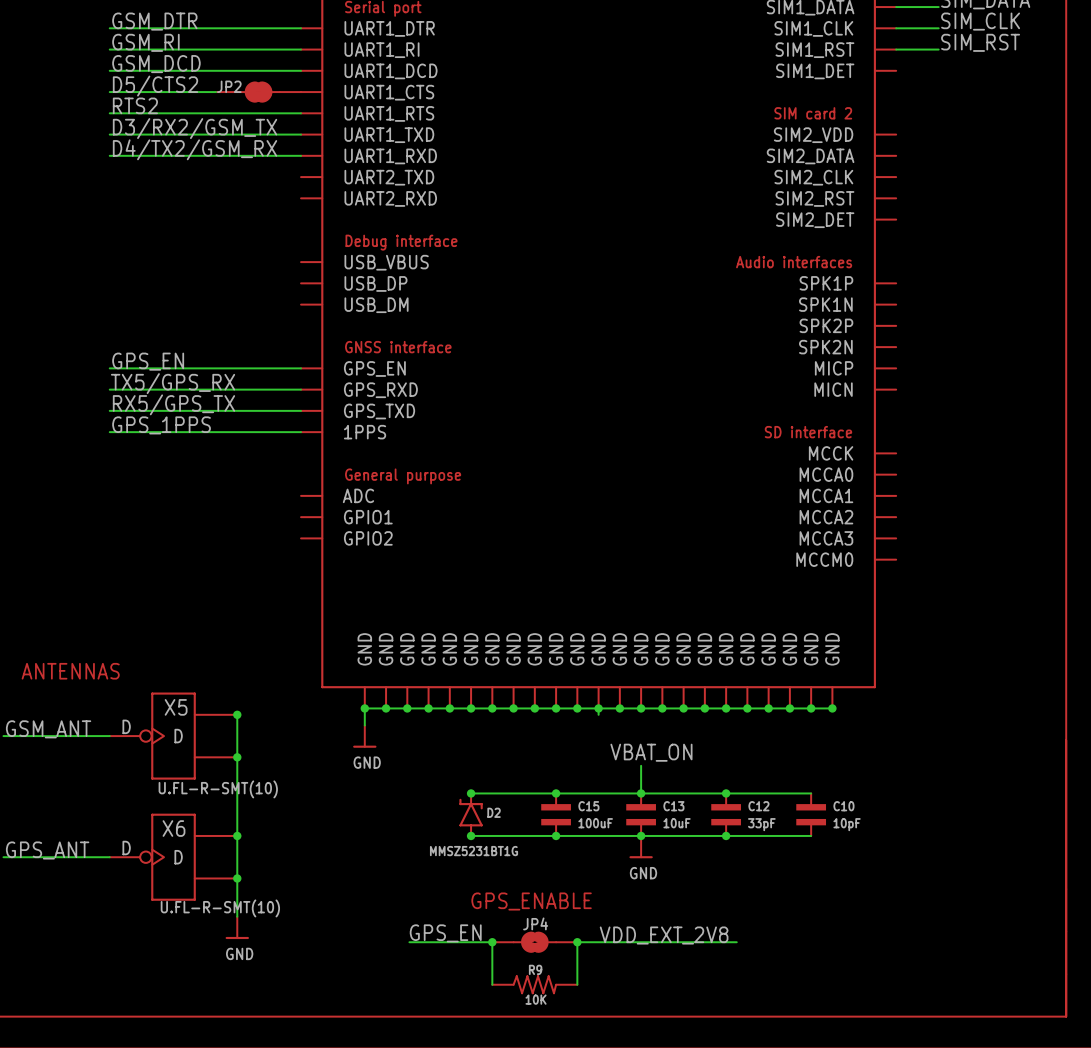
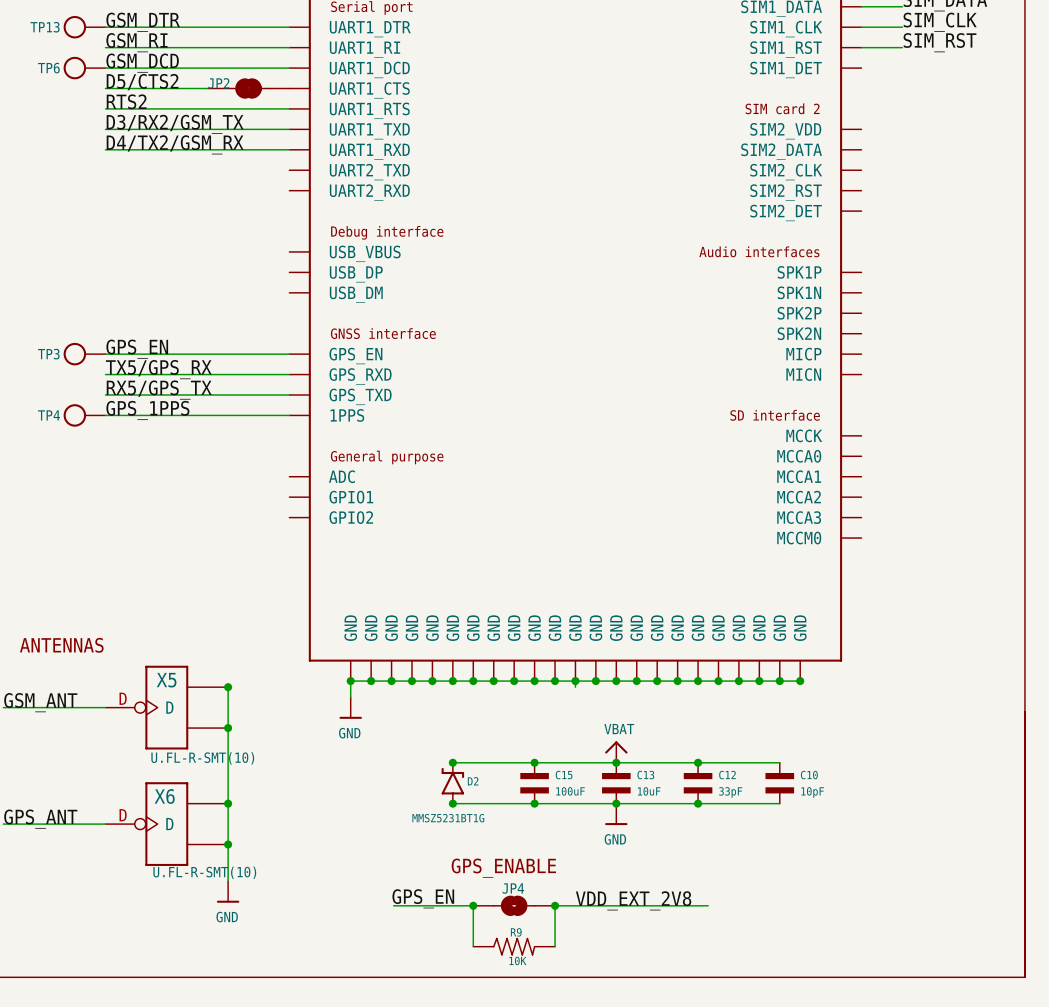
TP13: none -> (84, 27)
TP6: none -> (84, 68)
TP3: none -> (84, 354)
TP4: none -> (84, 415)
label: VBAT_ON (651, 752) -> none
power symbol: none -> VBAT (616, 752)

